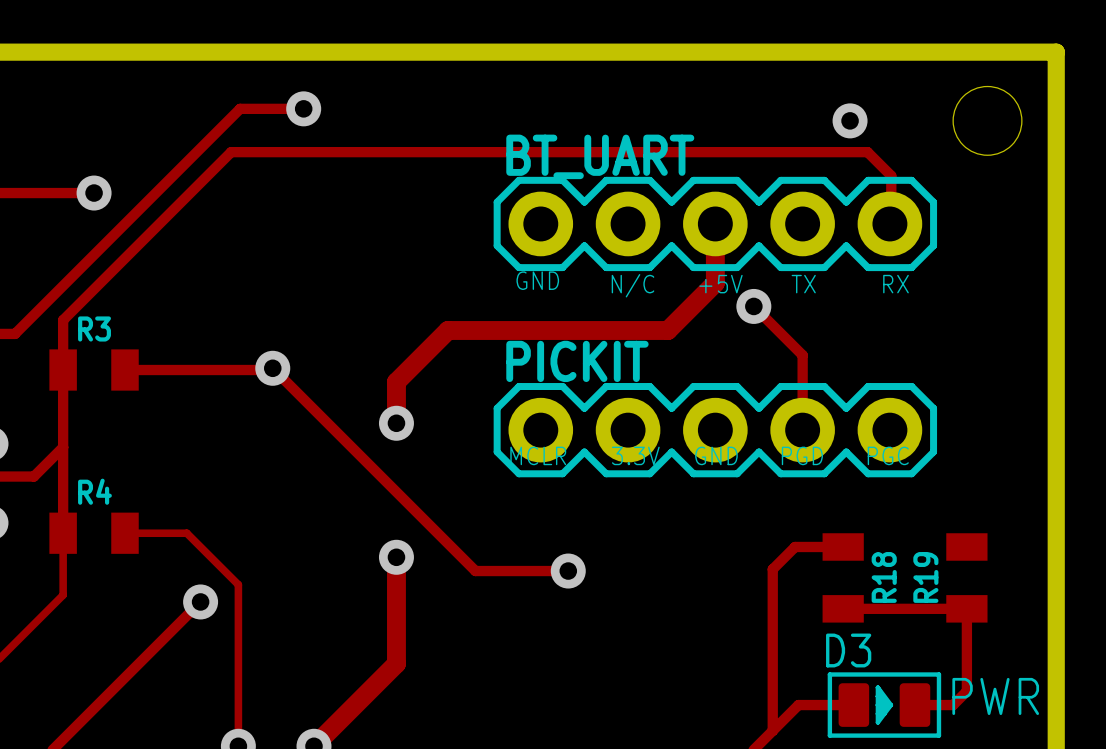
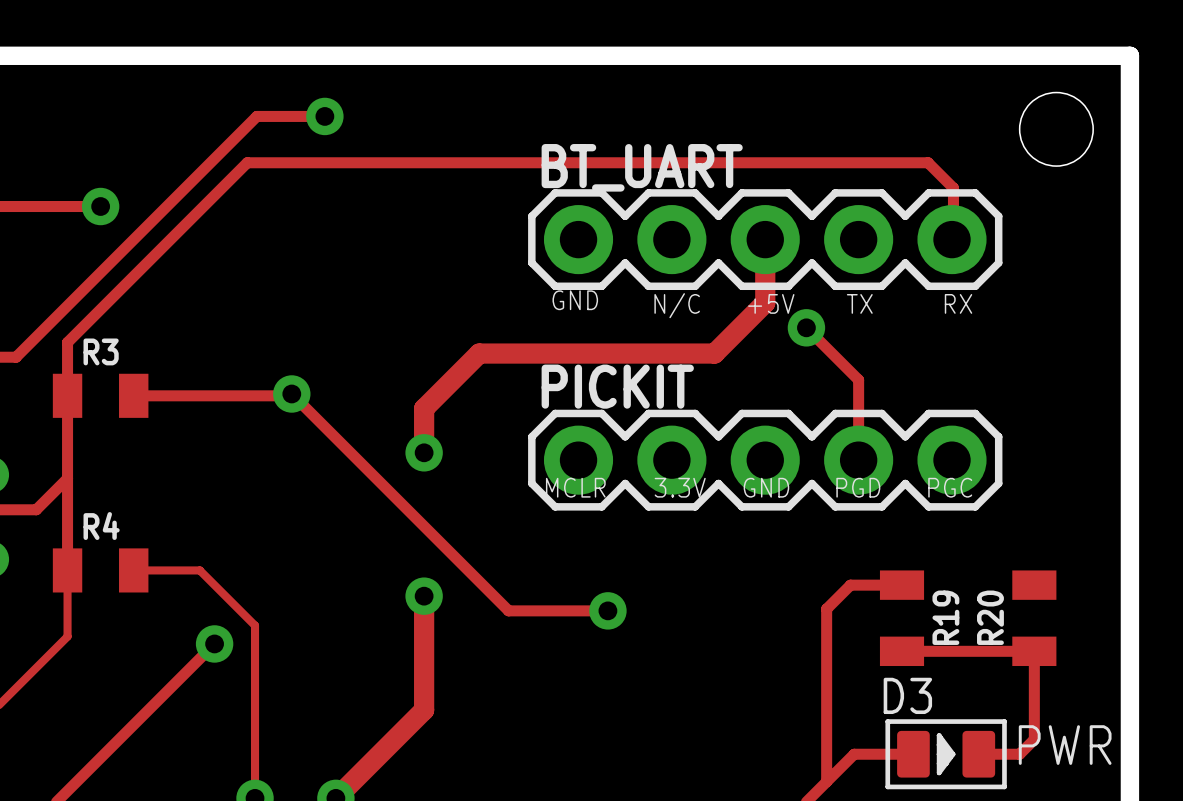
via: (850, 120) -> none
R18 name: R18 (884, 577) -> R19 (945, 617)
R19 name: R19 (925, 577) -> R20 (990, 617)

